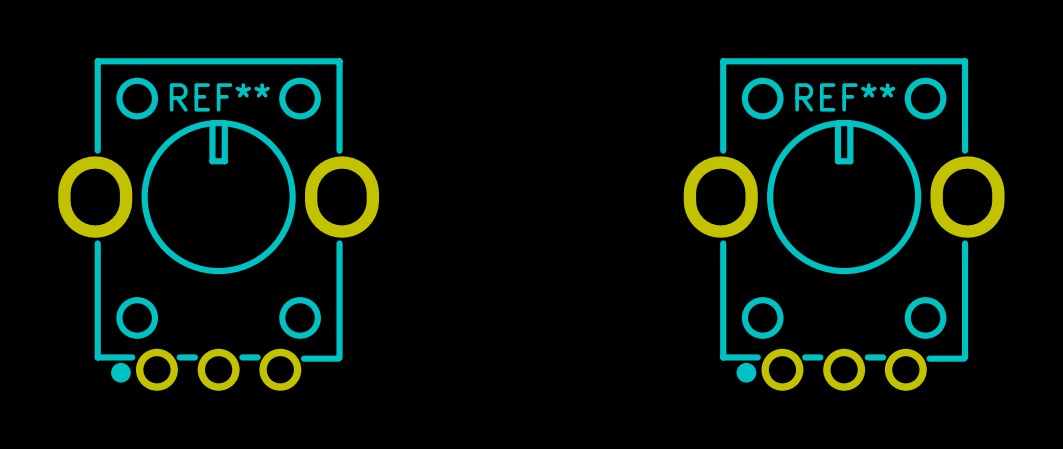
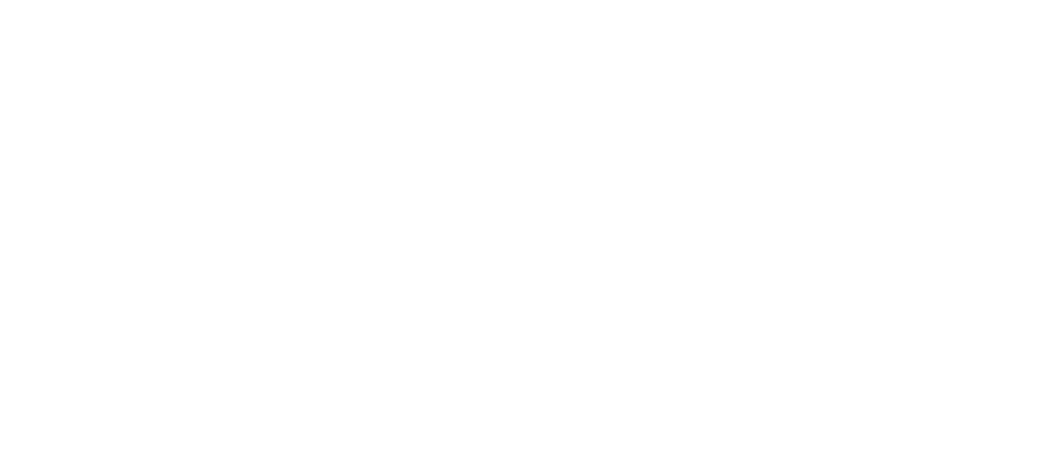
REF**: (218, 224) -> none
REF**: (844, 224) -> none

